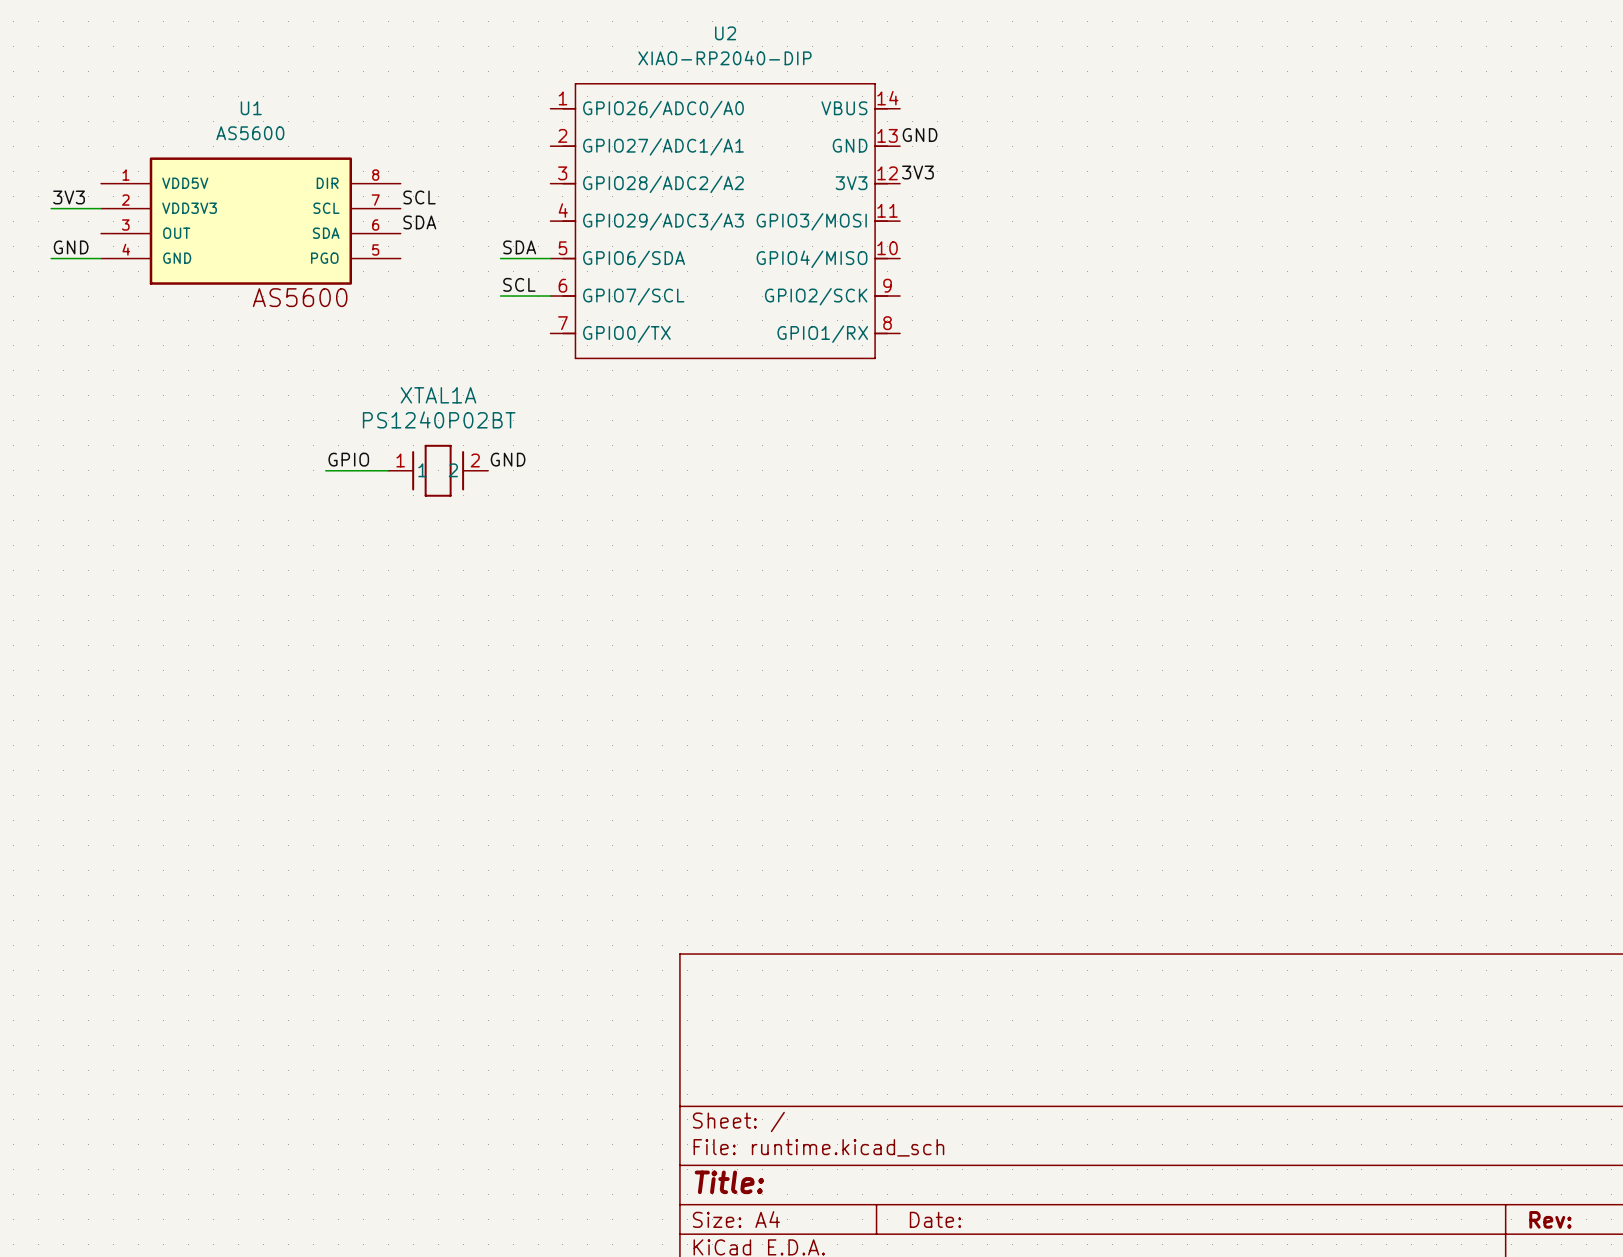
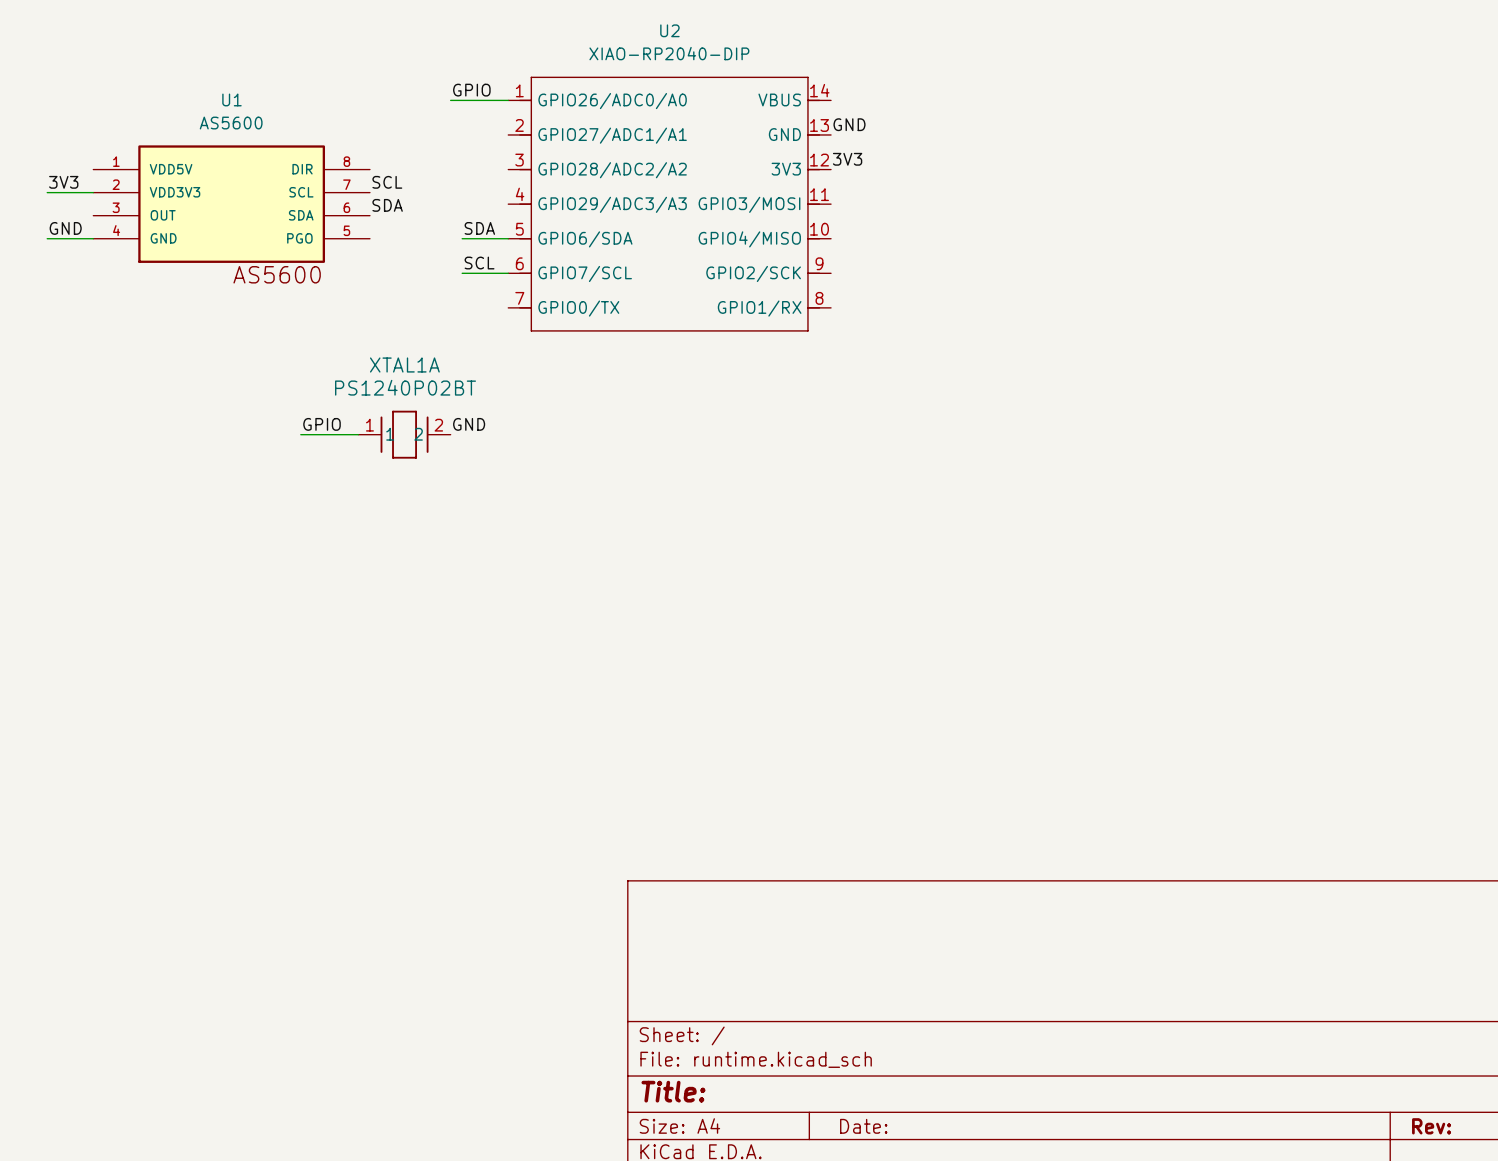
label: none -> GPIO (471, 90)
wire: none -> (450, 100) (508, 100)

